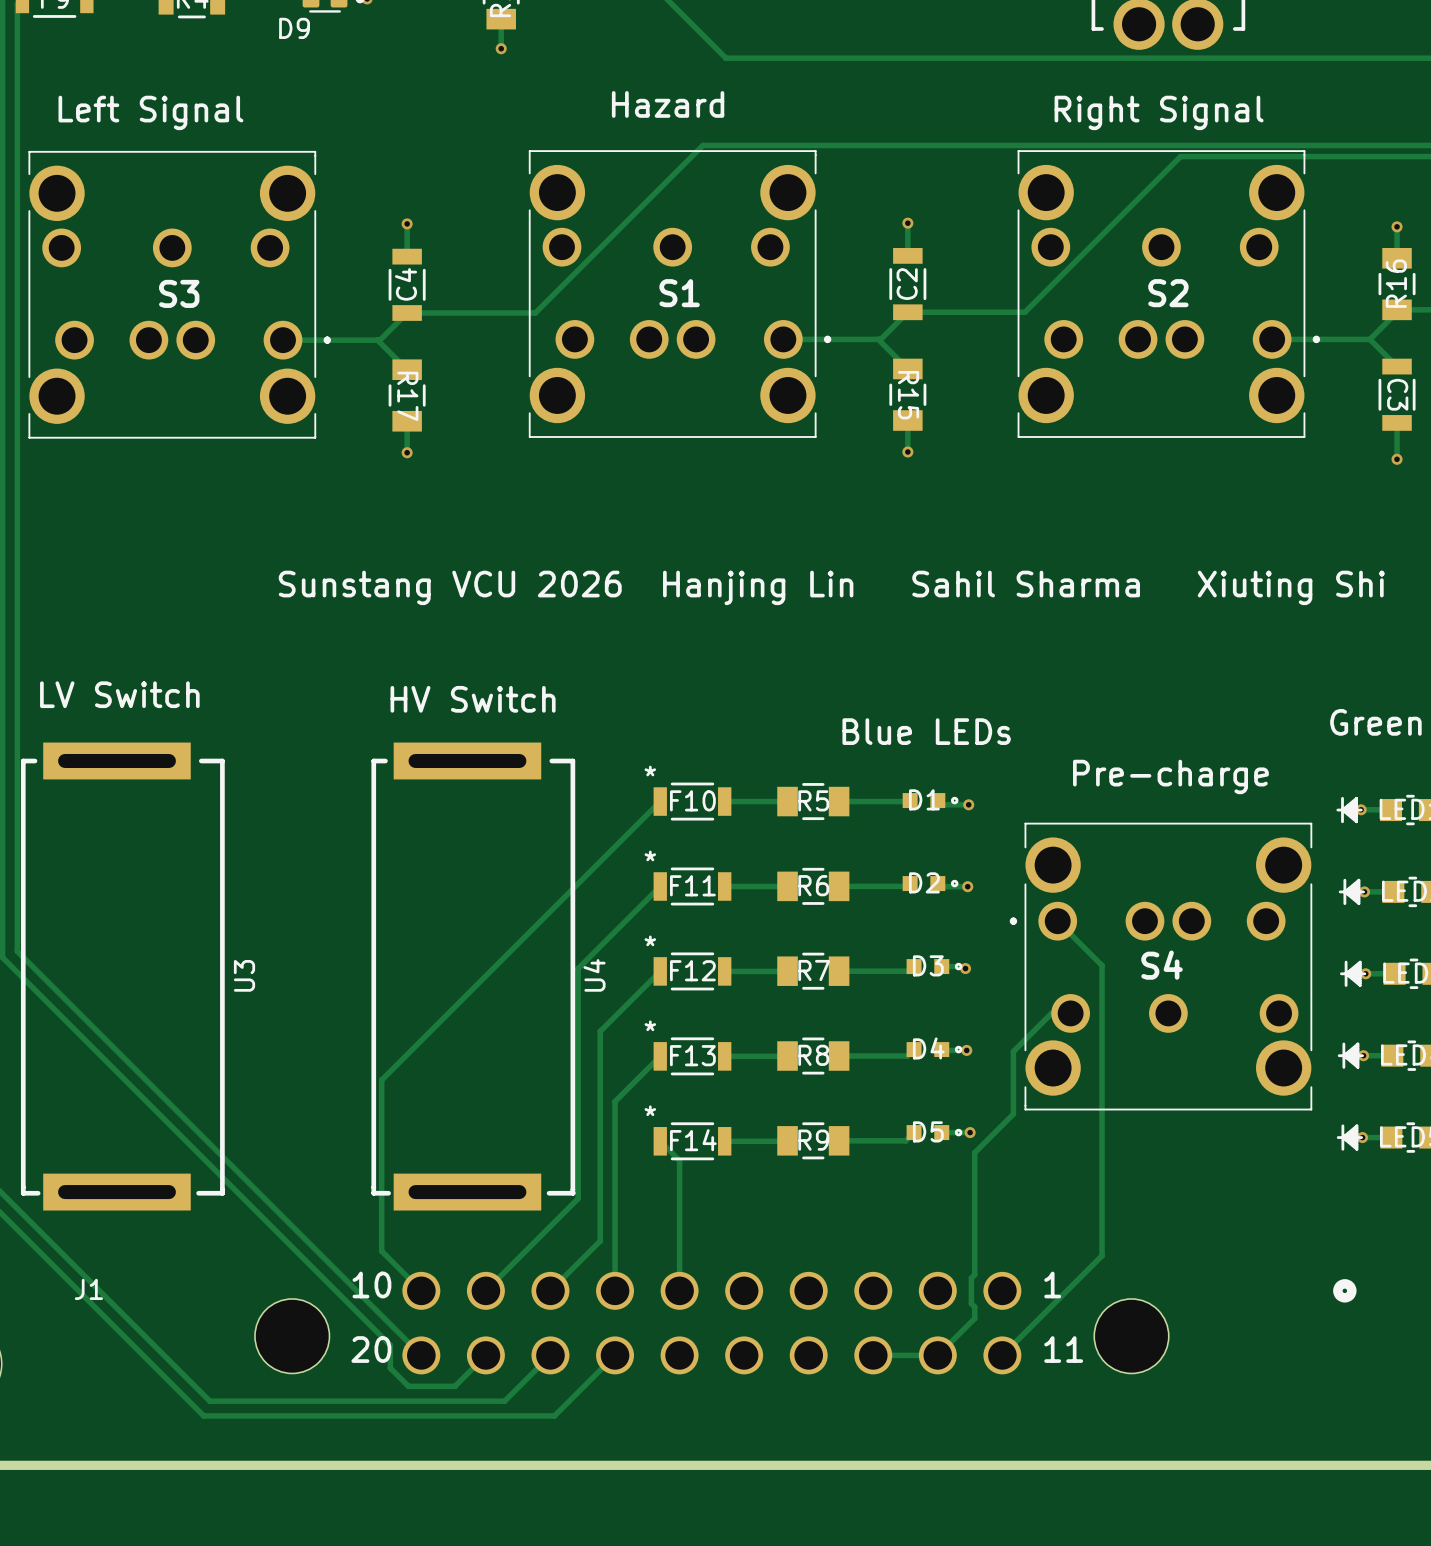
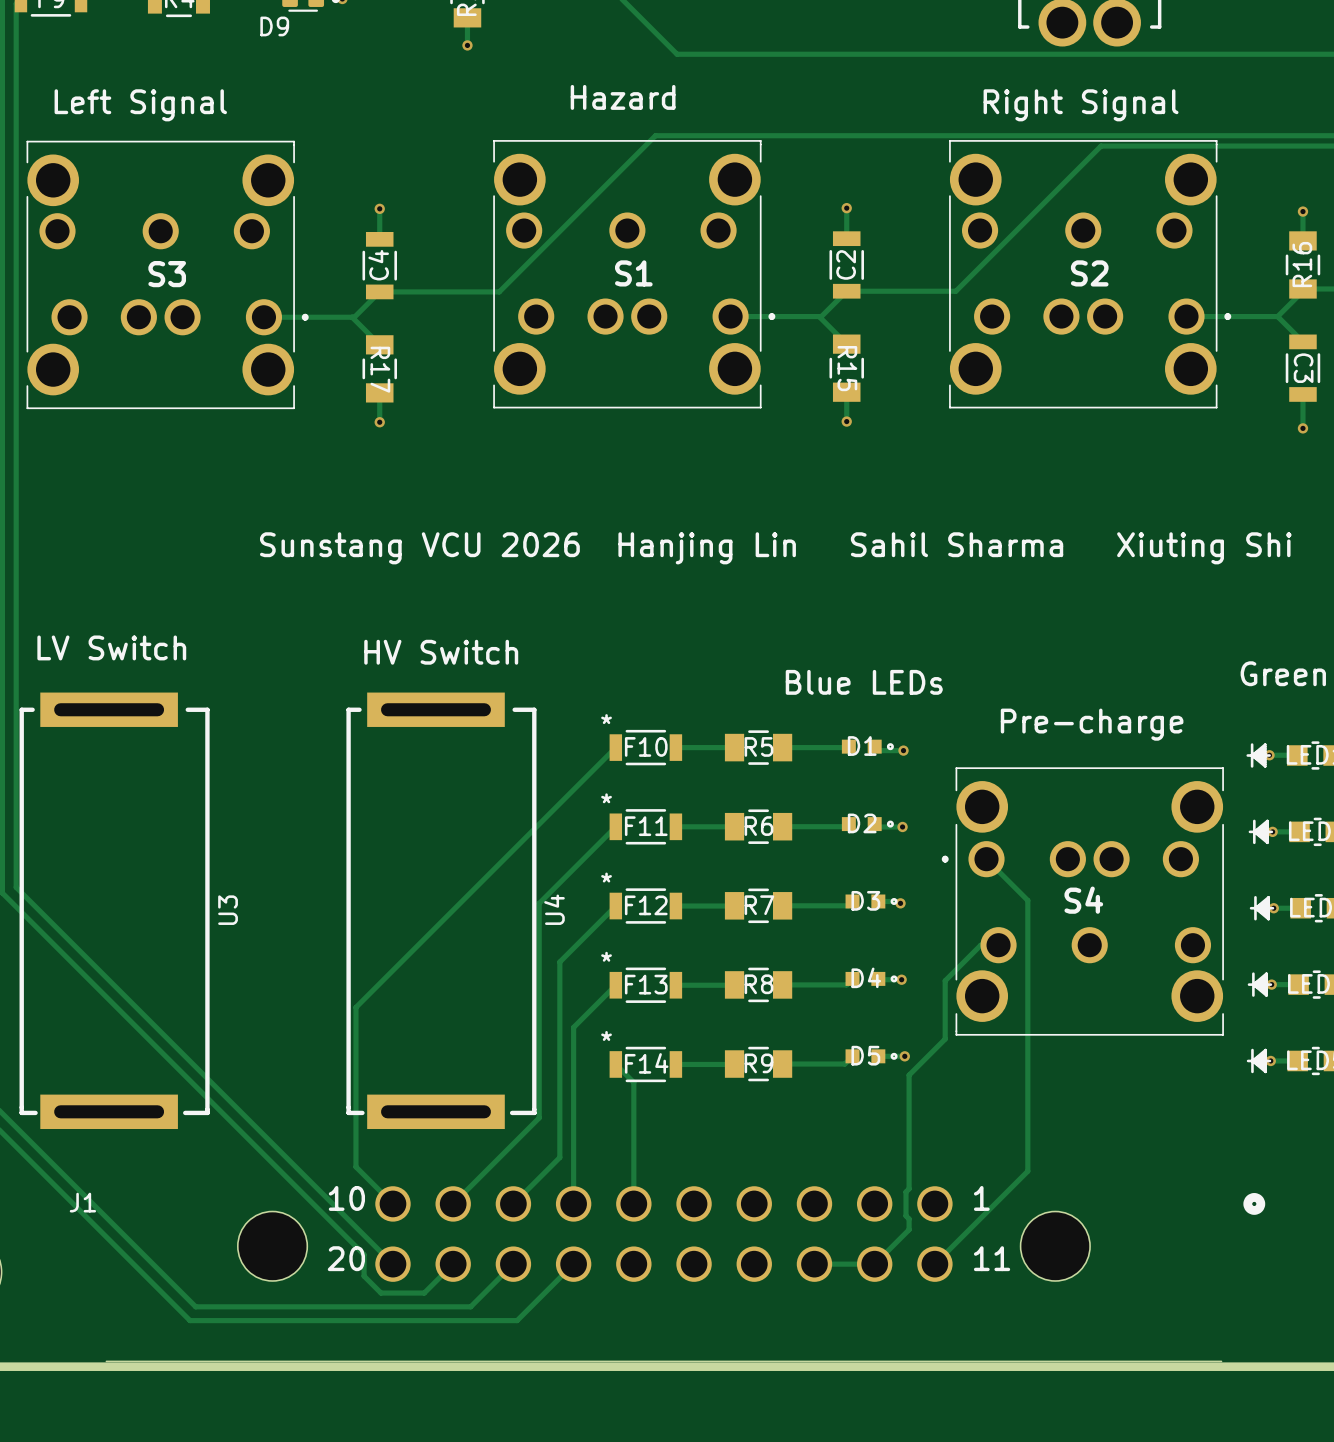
J1 footprint: [254, 1271, 1357, 1375] -> [106, 1186, 1266, 1362]

